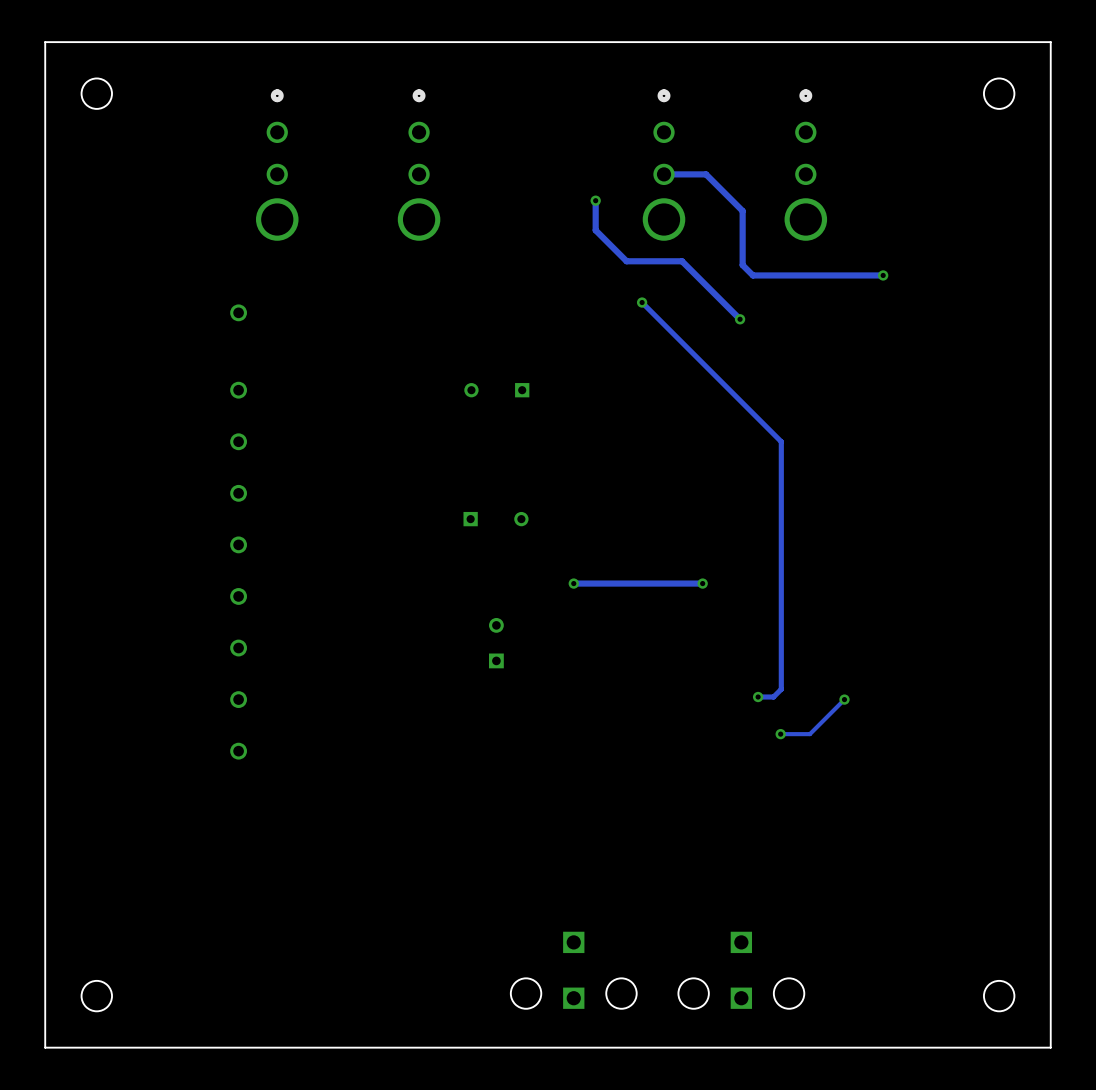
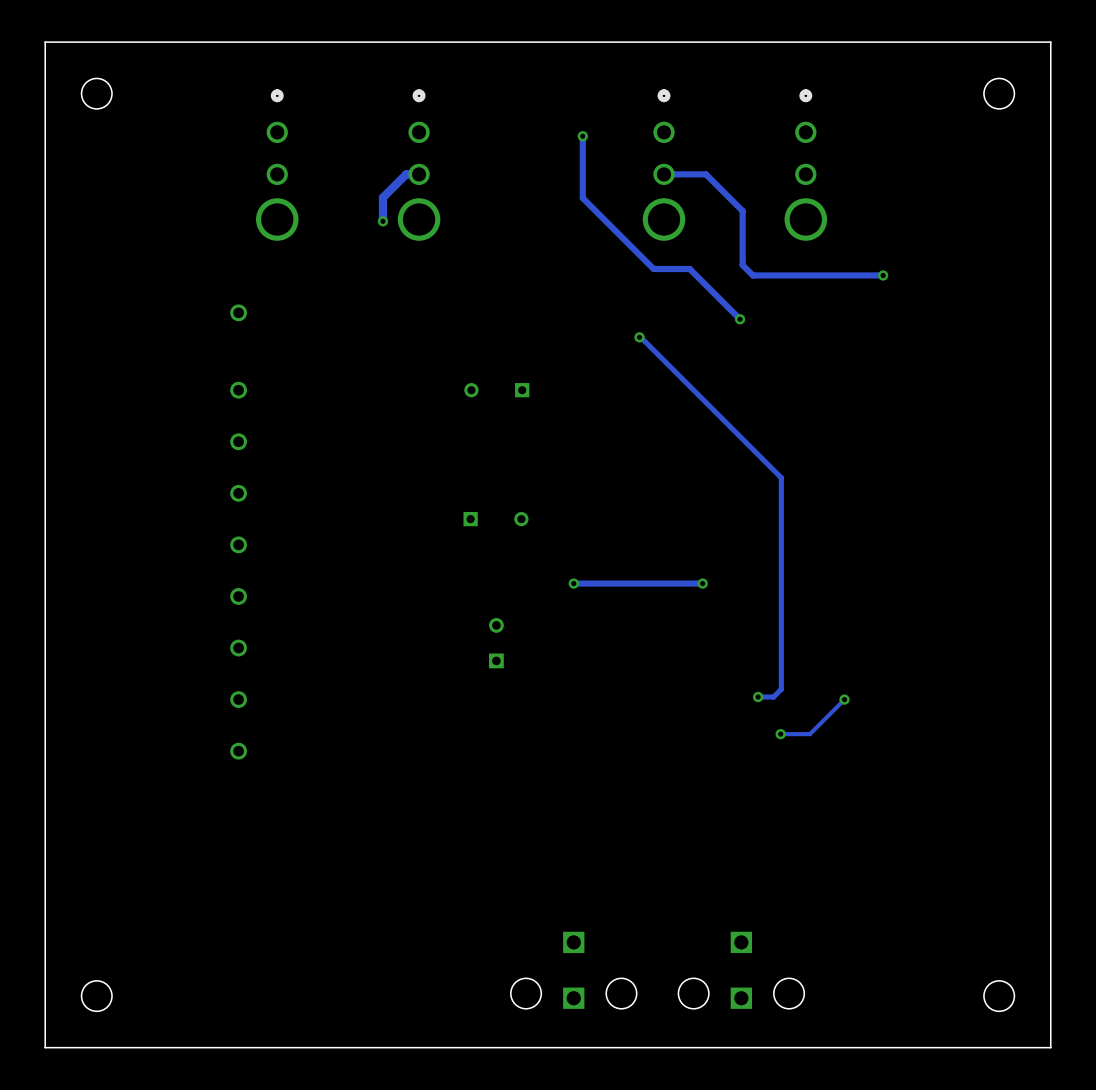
via: none -> (582, 136)
track: none -> (419, 174) (406, 174) (382, 197) (382, 221)
track: (595, 200) (595, 230) (626, 261) (682, 261) (689, 269) -> (582, 136) (582, 198) (653, 269) (689, 269)
via: (595, 200) -> none
via: none -> (382, 221)
track: (642, 302) (781, 441) (781, 477) -> (639, 337) (781, 477)
via position: (642, 302) -> (639, 337)

